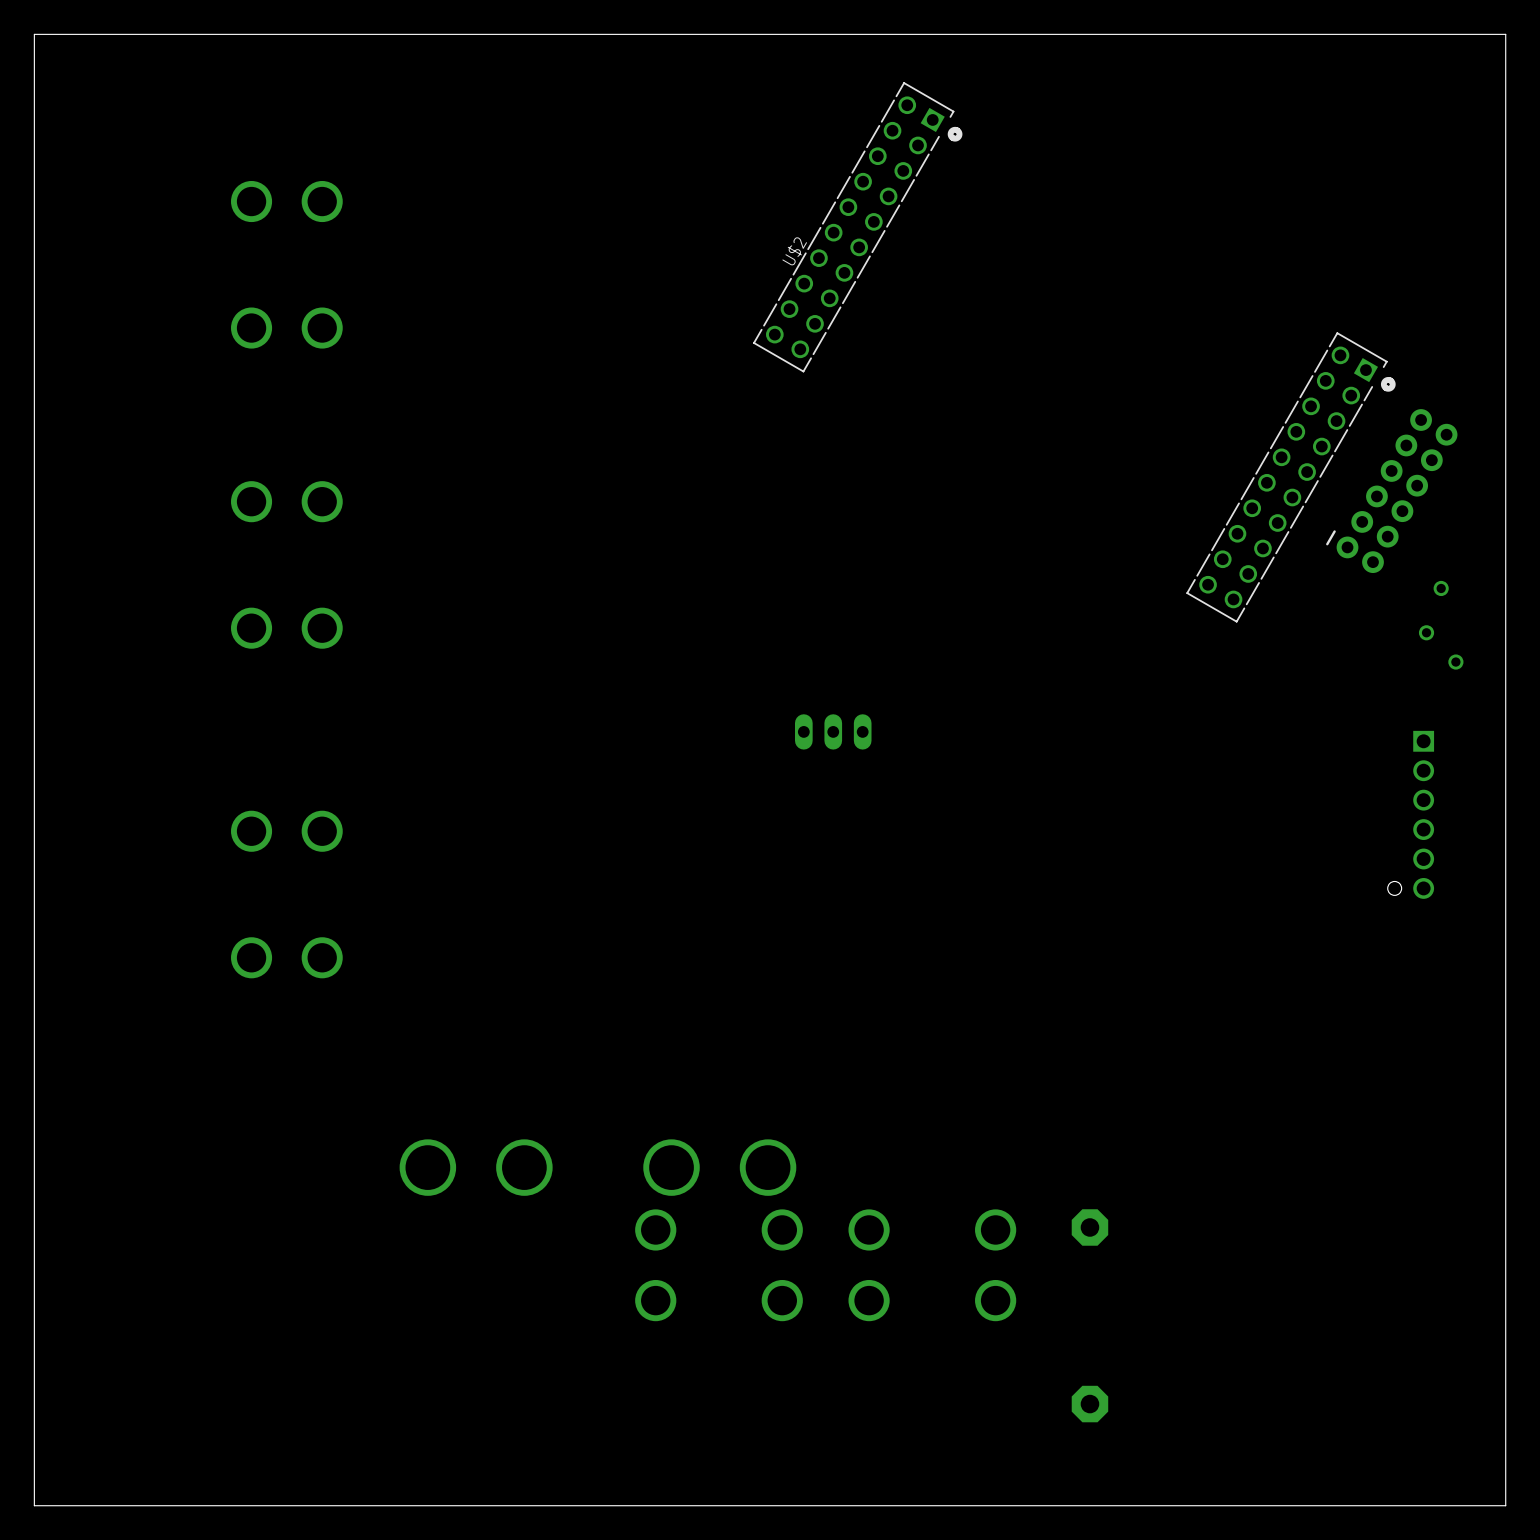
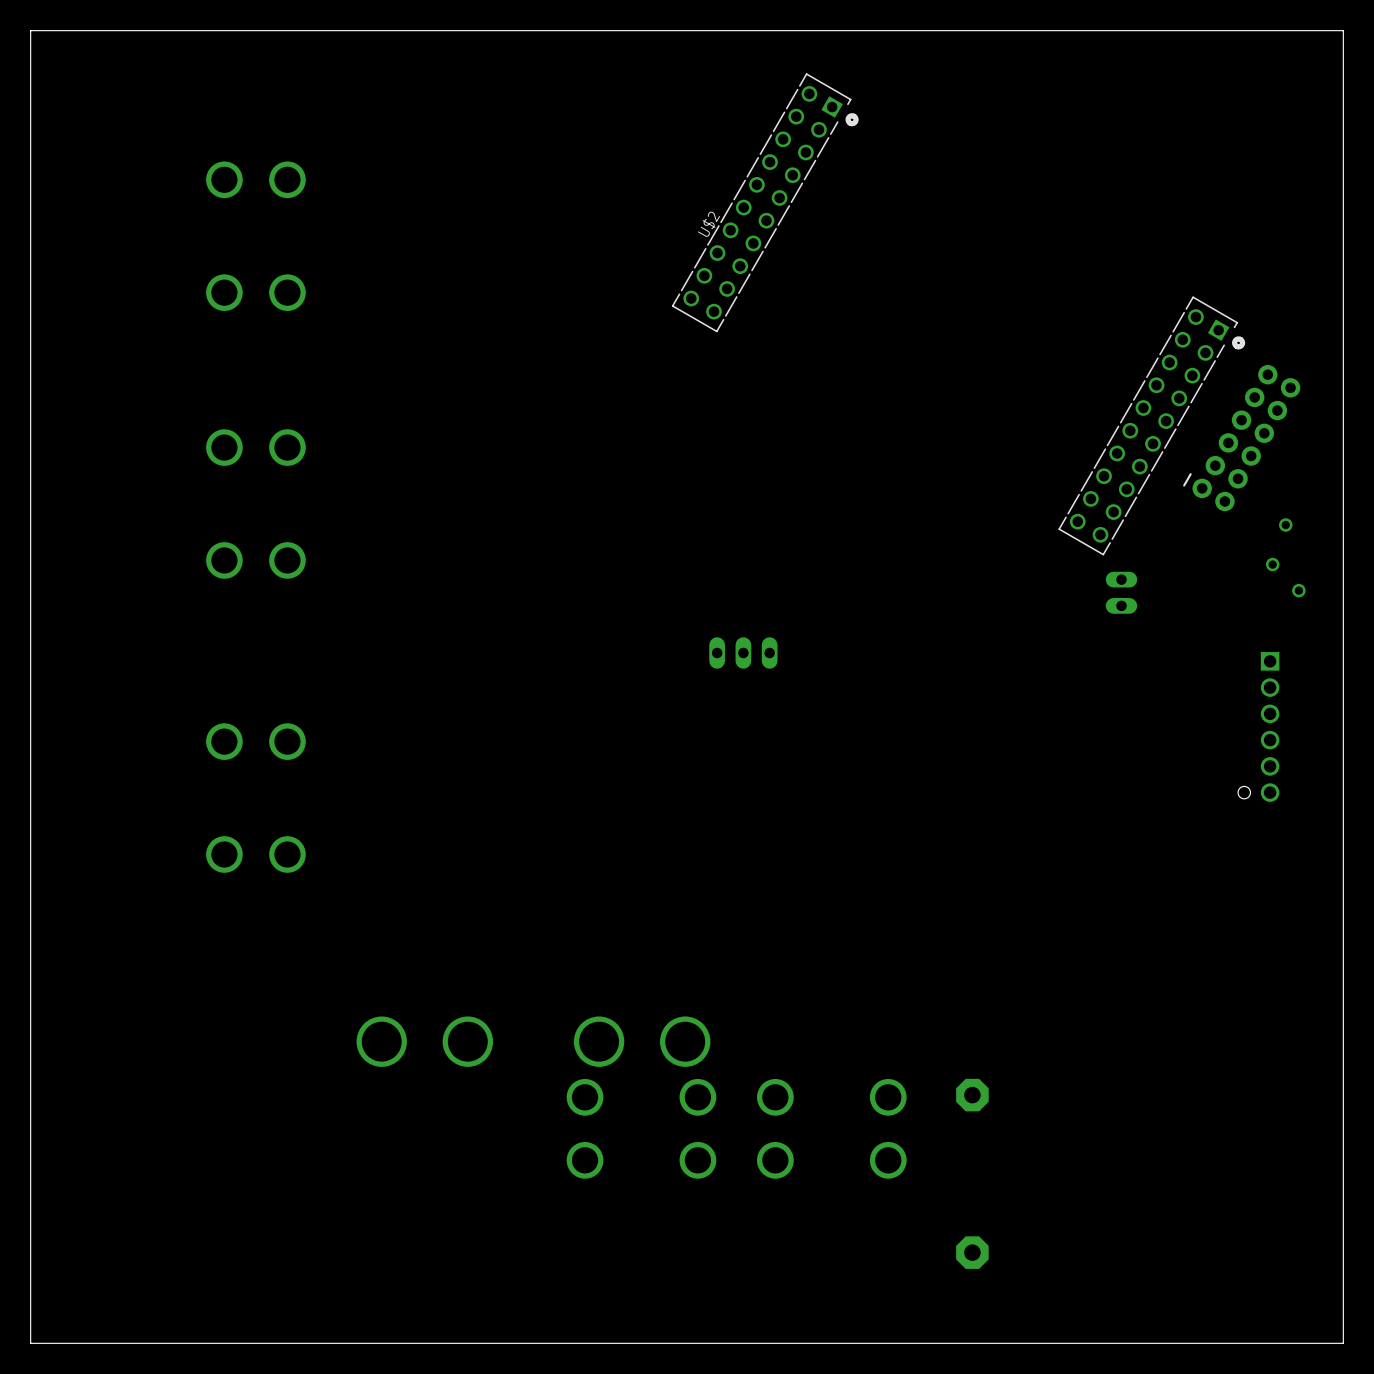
part: none -> (1121, 592)

